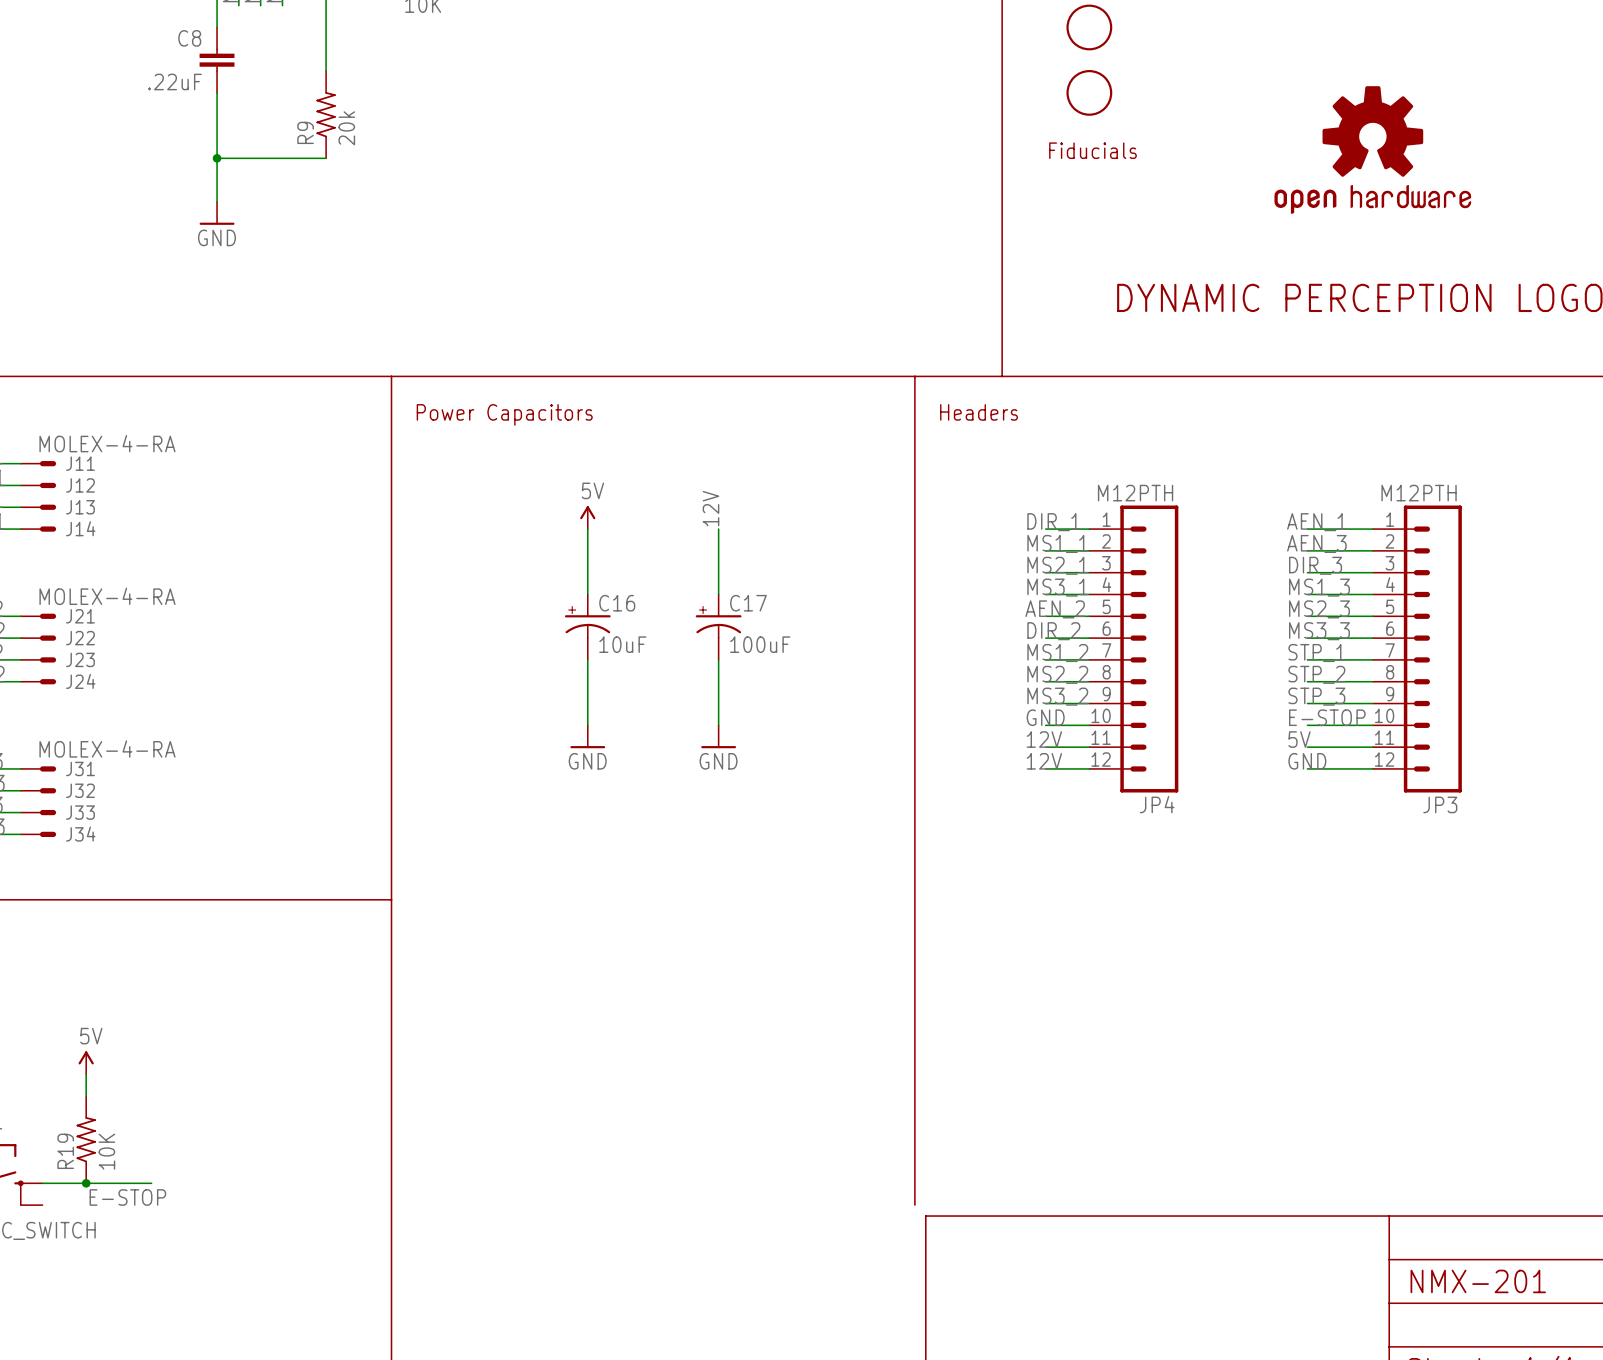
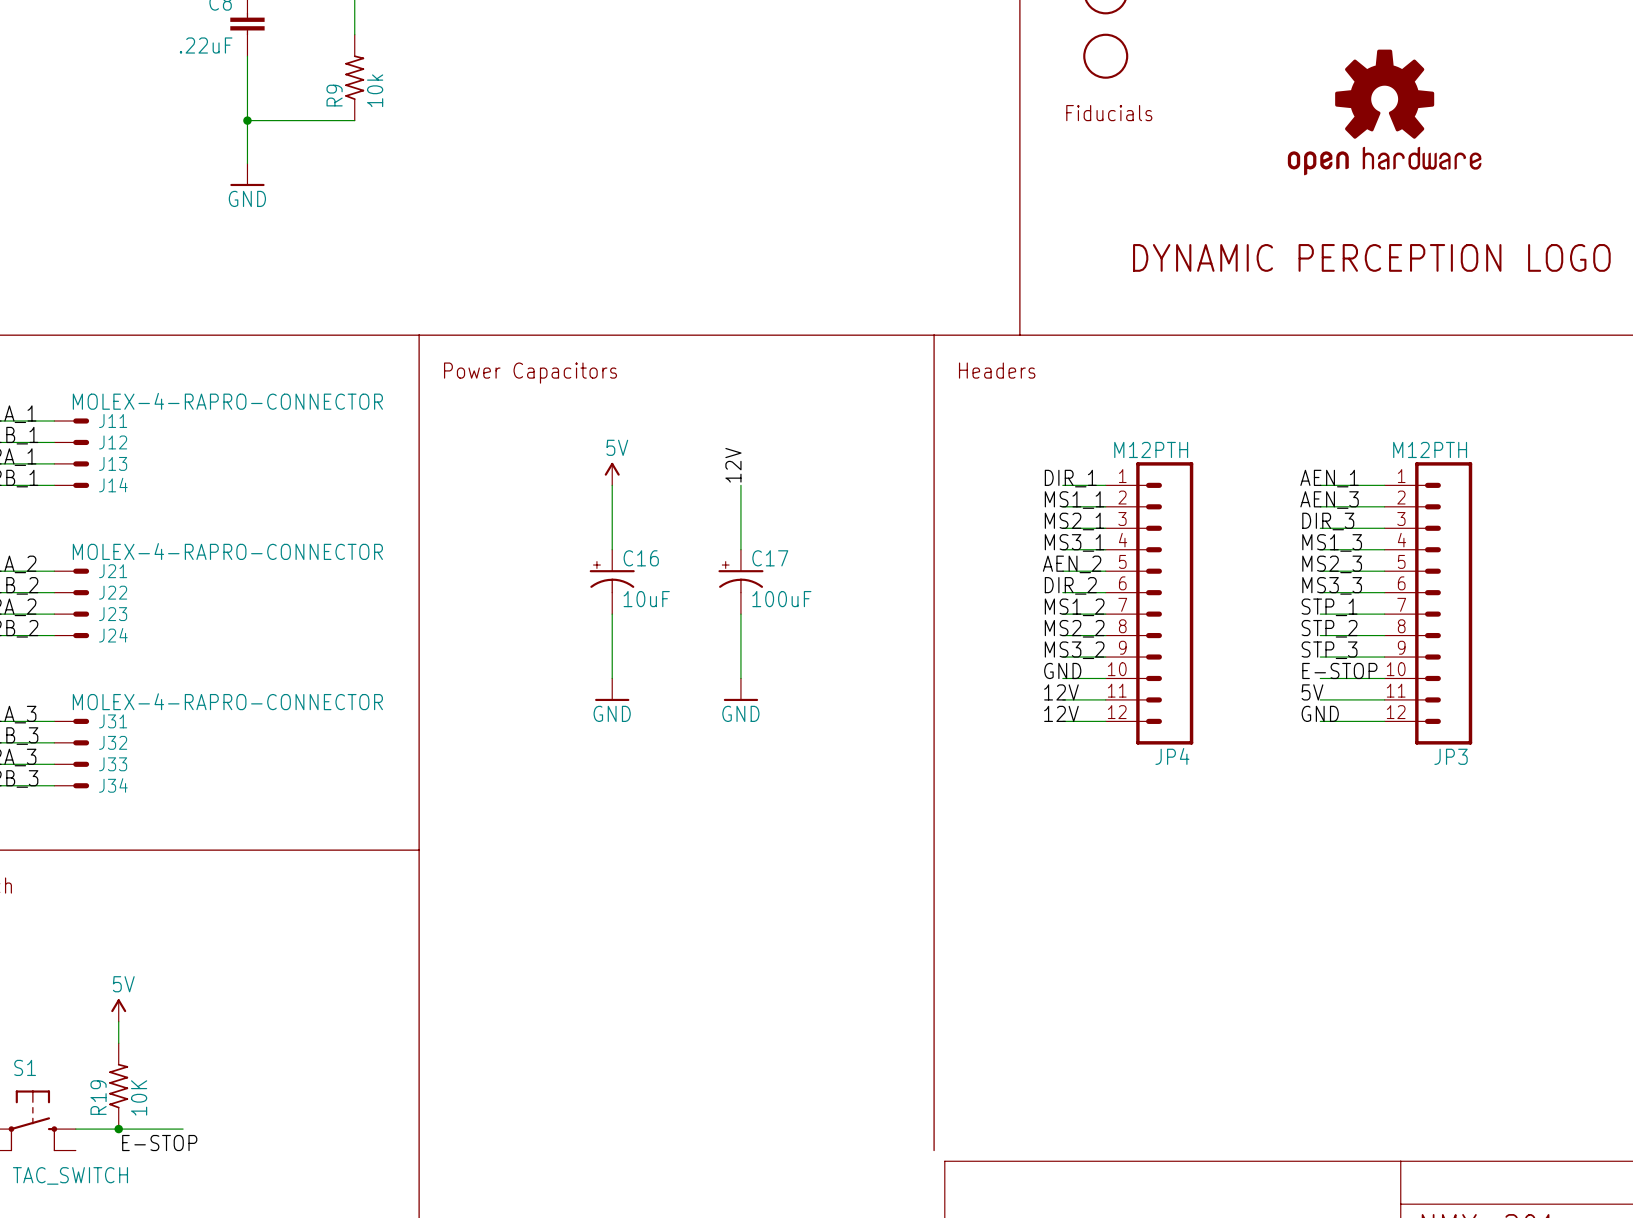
R9 value: 20k (346, 128) -> 10k (375, 90)
J11 value: MOLEX-4-RA (107, 443) -> MOLEX-4-RAPRO-CONNECTOR (227, 401)
J21 value: MOLEX-4-RA (107, 596) -> MOLEX-4-RAPRO-CONNECTOR (227, 551)
J31 value: MOLEX-4-RA (107, 748) -> MOLEX-4-RAPRO-CONNECTOR (227, 701)

